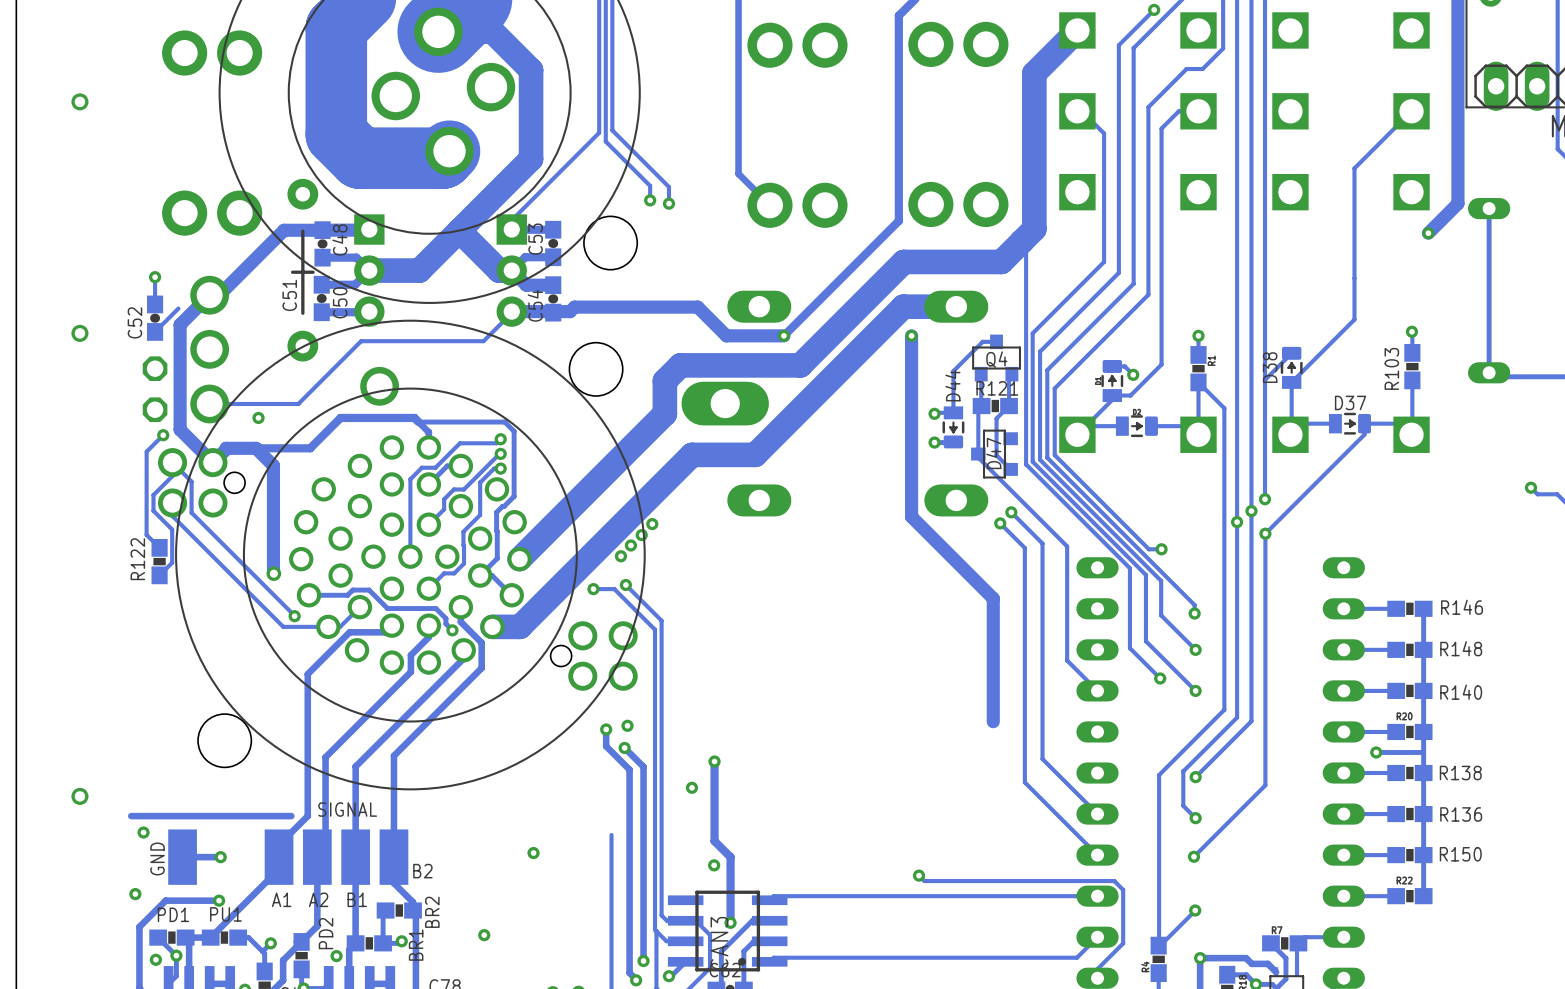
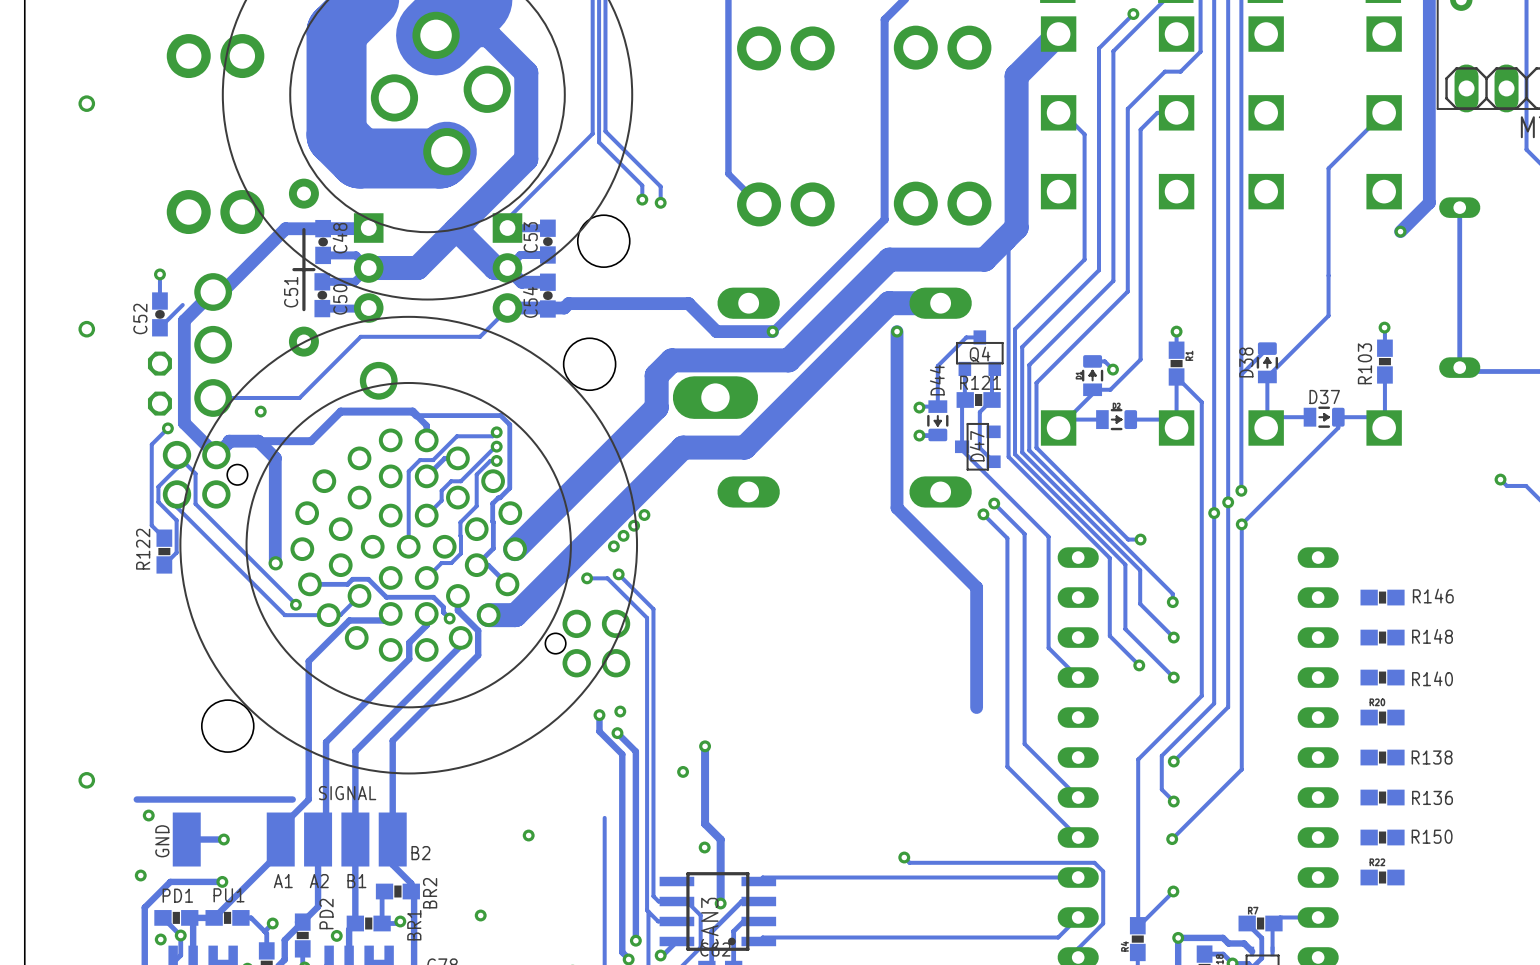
track: (1396, 608) (1343, 608) -> none
track: (1423, 608) (1423, 896) -> none
track: (1396, 649) (1343, 649) -> none
track: (1396, 690) (1343, 690) -> none
track: (1396, 731) (1343, 731) -> none
via: (1376, 752) -> none
track: (1423, 752) (1376, 752) -> none
track: (1396, 773) (1343, 773) -> none
track: (1396, 814) (1343, 814) -> none
track: (1396, 855) (1343, 855) -> none
track: (1396, 896) (1343, 896) -> none

